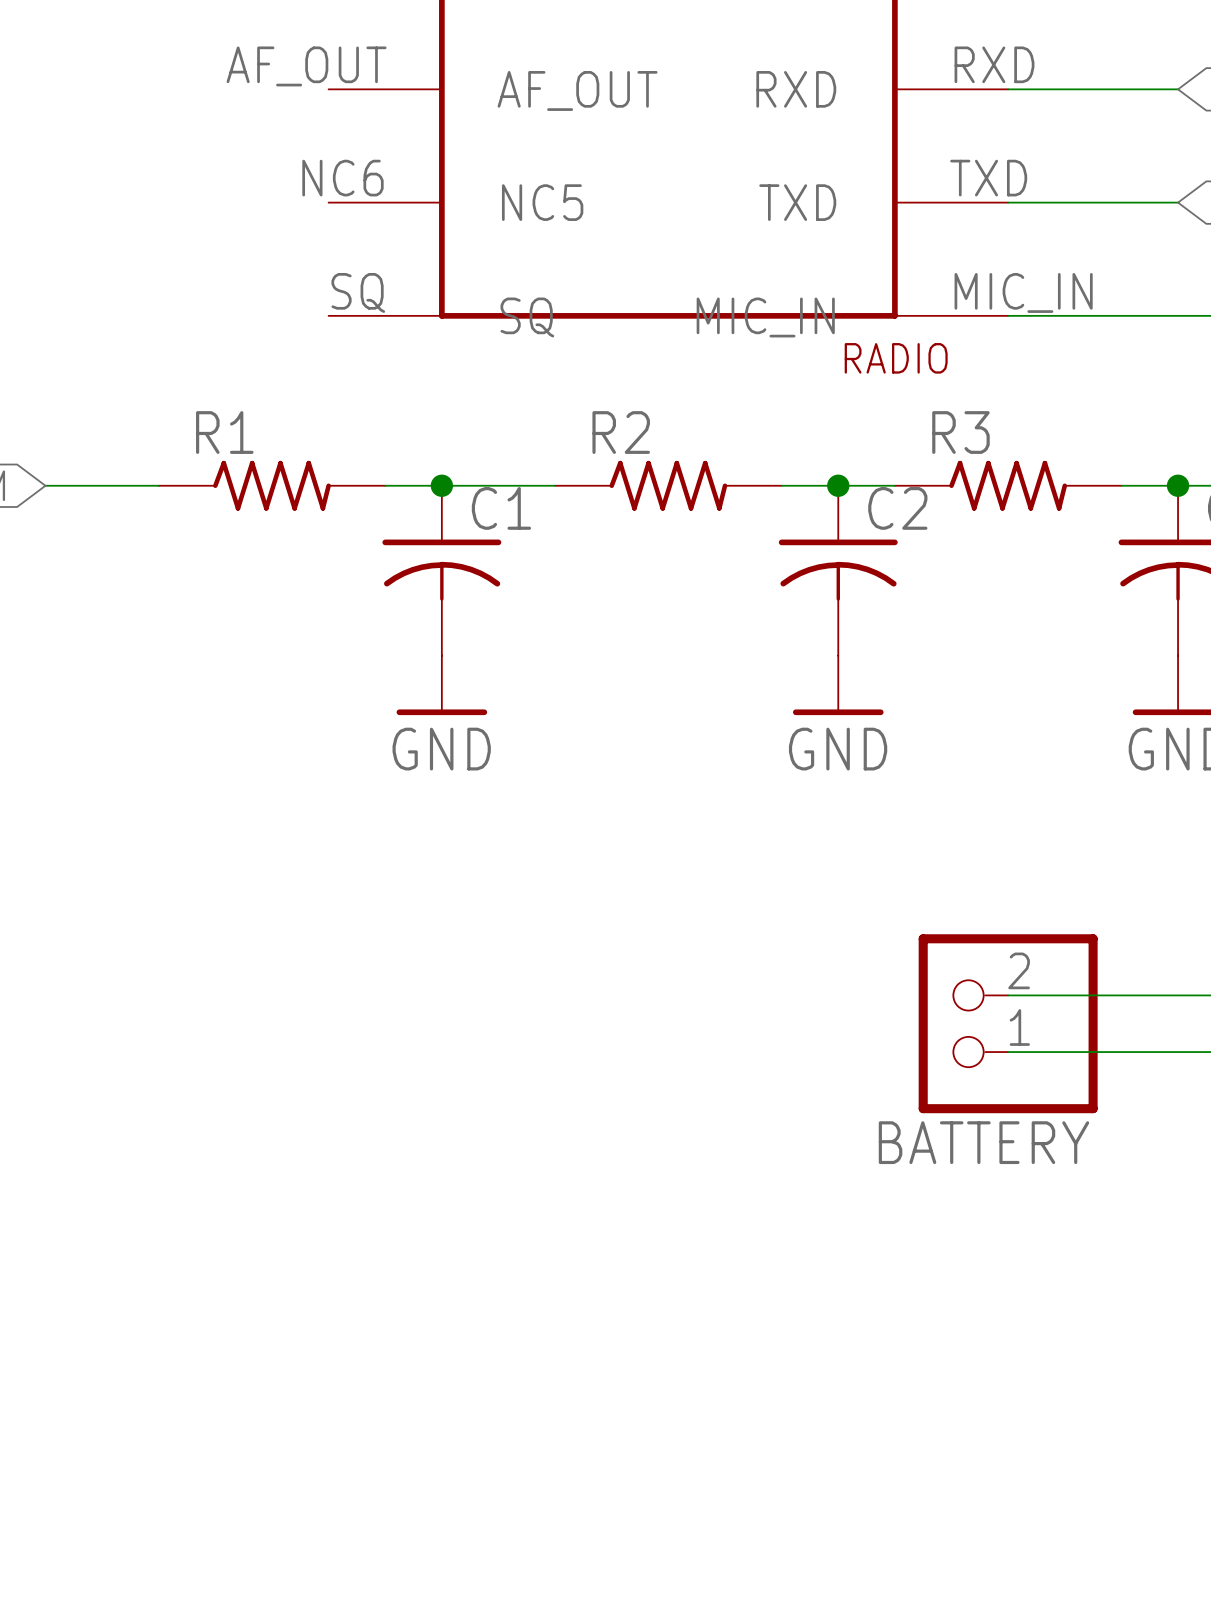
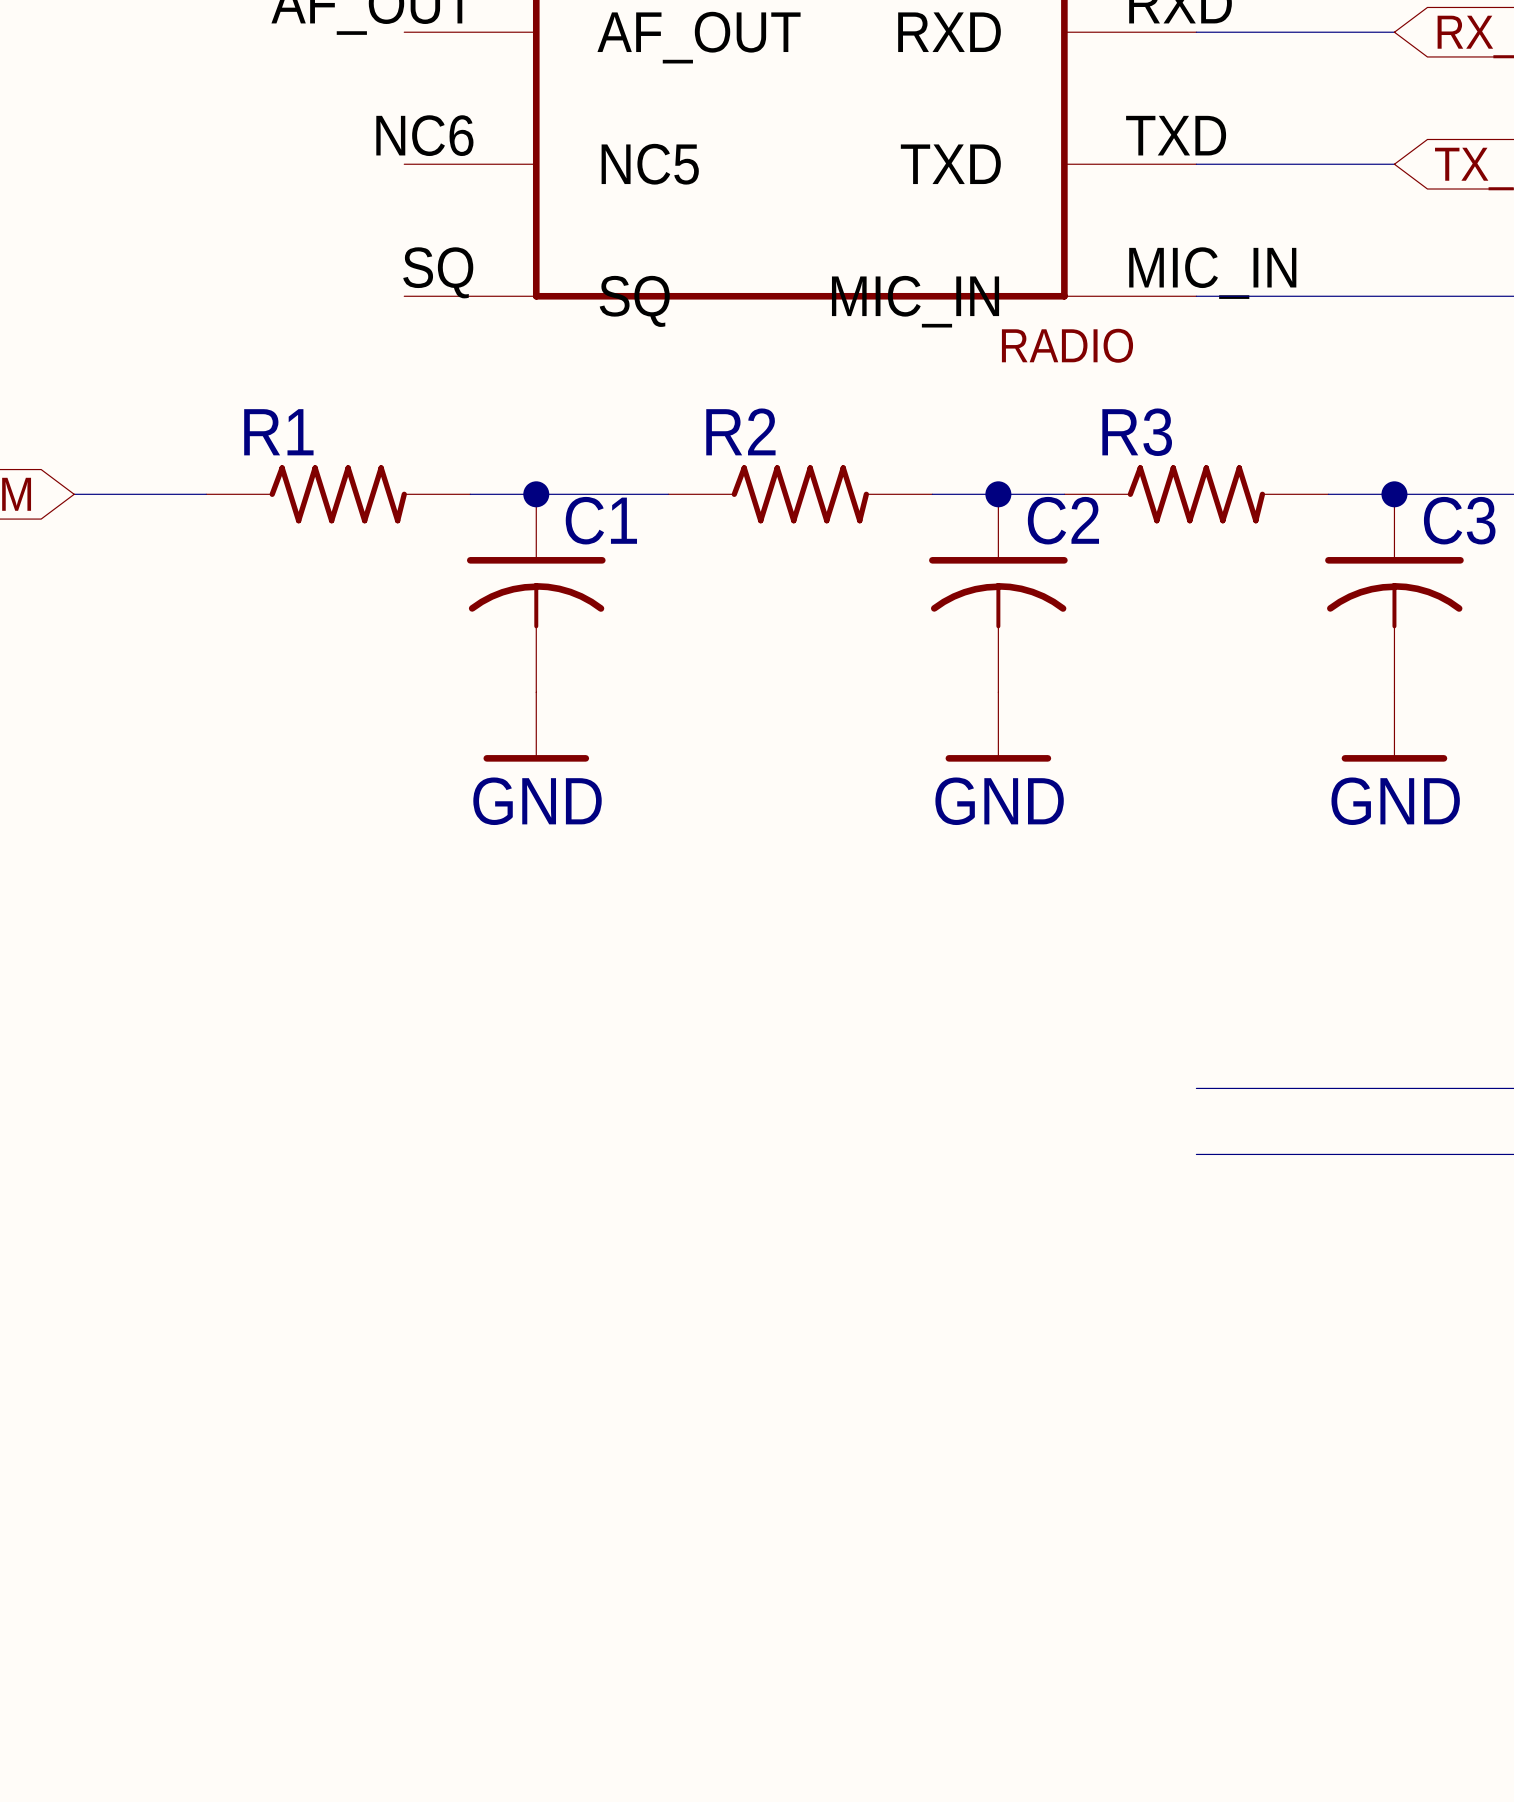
BATTERY: (1008, 1023) -> none

